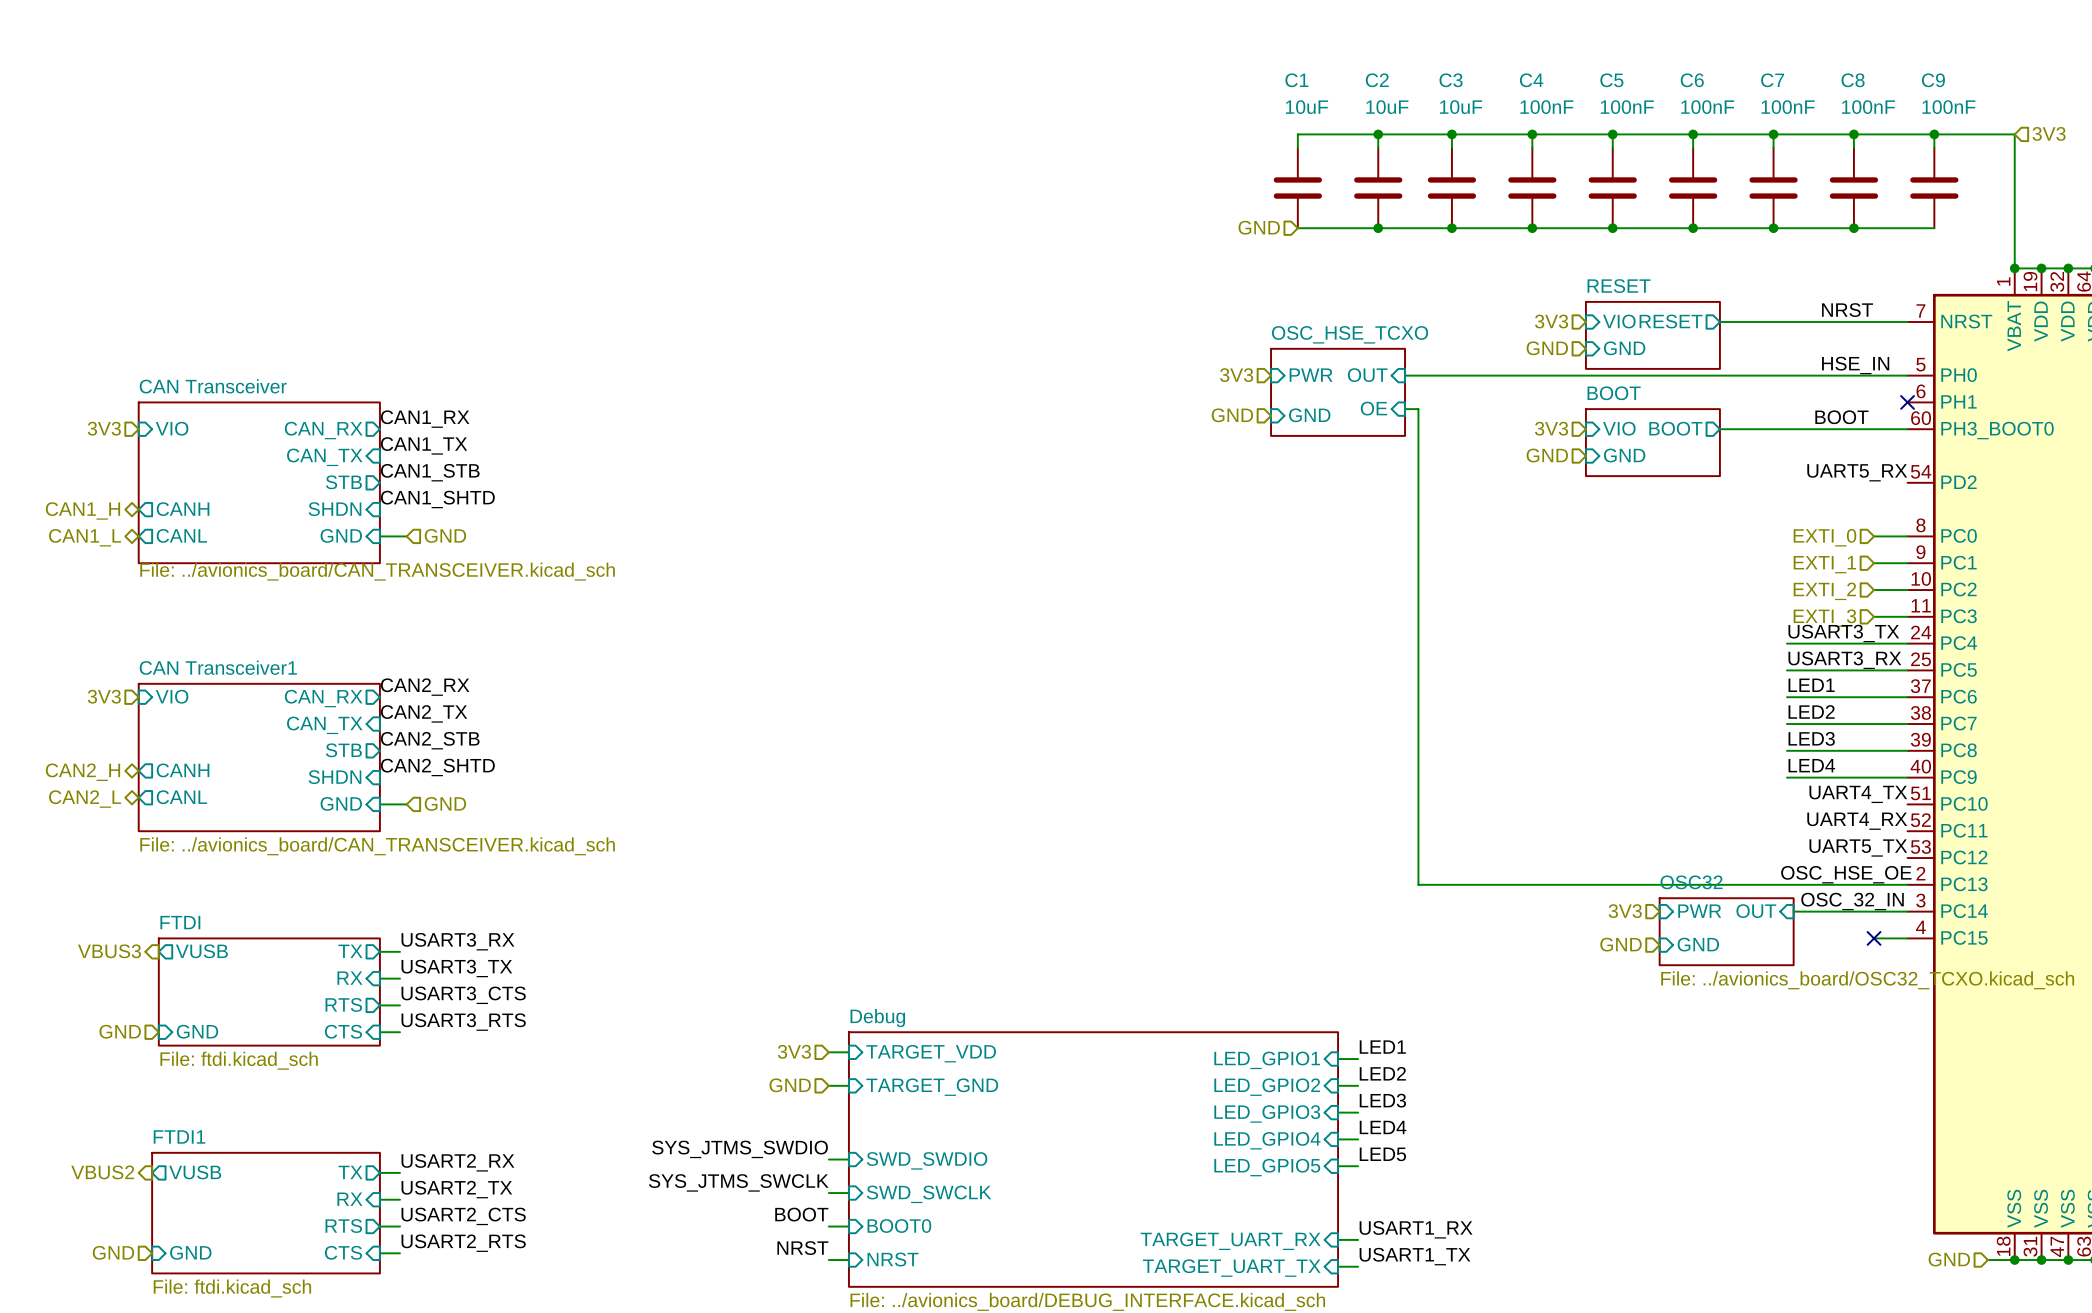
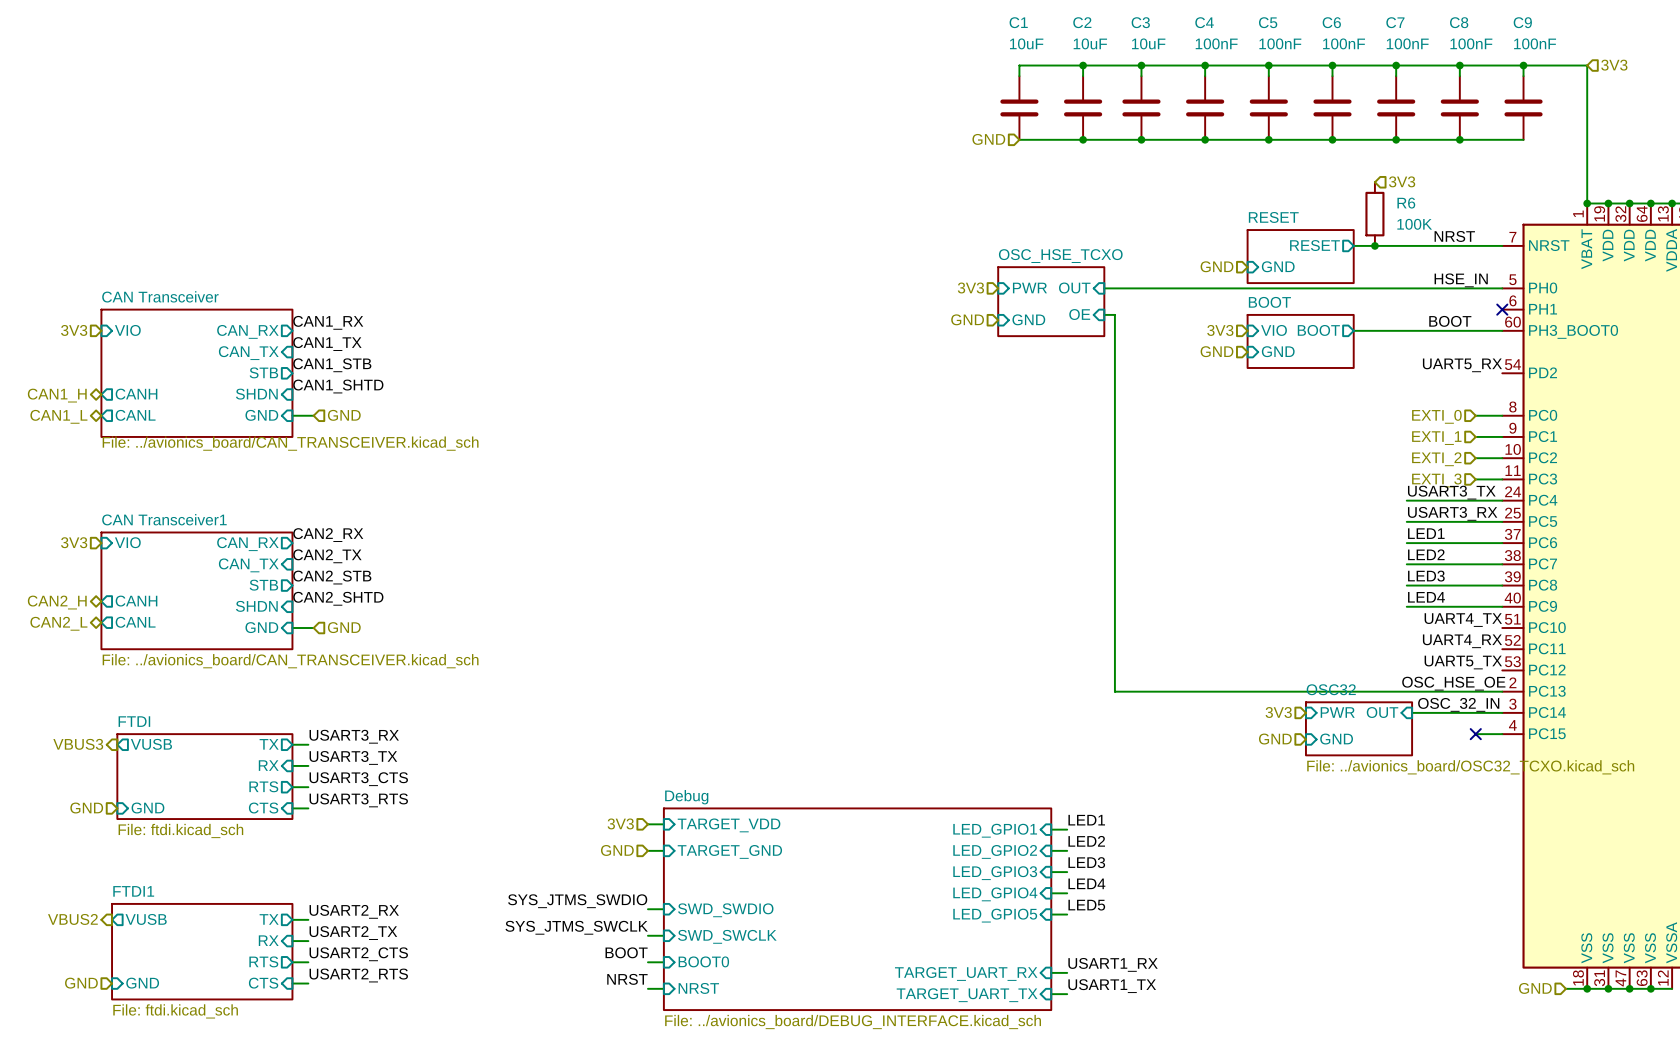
junction: none -> (1083, 65)
junction: none -> (1141, 65)
junction: none -> (1205, 65)
junction: none -> (1268, 65)
junction: none -> (1332, 65)
junction: none -> (1396, 65)
junction: none -> (1459, 65)
hierarchical label position: 3V3 (2049, 133) -> 3V3 (1614, 65)
junction: (1378, 134) -> none
junction: (1451, 134) -> none
junction: (1532, 134) -> none
junction: (1612, 134) -> none
junction: (1693, 134) -> none
junction: (1773, 134) -> none
junction: (1853, 134) -> none
junction position: (1934, 134) -> (1523, 65)
wire: (2014, 134) (1297, 134) (1297, 147) -> (1587, 97) (1587, 65) (1019, 65) (1019, 76)
C1 position: (1297, 188) -> (1019, 107)
junction: none -> (1083, 139)
C2 position: (1378, 188) -> (1083, 107)
junction: none -> (1141, 139)
C3 position: (1451, 188) -> (1141, 107)
junction: none -> (1205, 139)
C4 position: (1532, 188) -> (1205, 107)
junction: none -> (1268, 139)
C5 position: (1612, 188) -> (1268, 107)
junction: none -> (1332, 139)
C6 position: (1693, 188) -> (1332, 107)
junction: none -> (1396, 139)
C7 position: (1773, 188) -> (1396, 107)
junction: none -> (1459, 139)
C8 position: (1853, 188) -> (1459, 107)
C9 position: (1934, 188) -> (1523, 107)
hierarchical label position: GND (1259, 227) -> GND (988, 139)
wire: (1297, 228) (1934, 228) -> (1019, 139) (1523, 139)
junction: (1378, 228) -> none
junction: (1451, 228) -> none
junction: (1532, 228) -> none
junction: (1612, 228) -> none
junction: (1693, 228) -> none
junction: (1773, 228) -> none
junction: (1853, 228) -> none
hierarchical label: none -> 3V3 (1402, 181)
R6: none -> 100K (1374, 214)
hierarchical label: 3V3 (1551, 321) -> none
sheet pin: VIO (1619, 321) -> none
junction: none -> (1374, 245)

